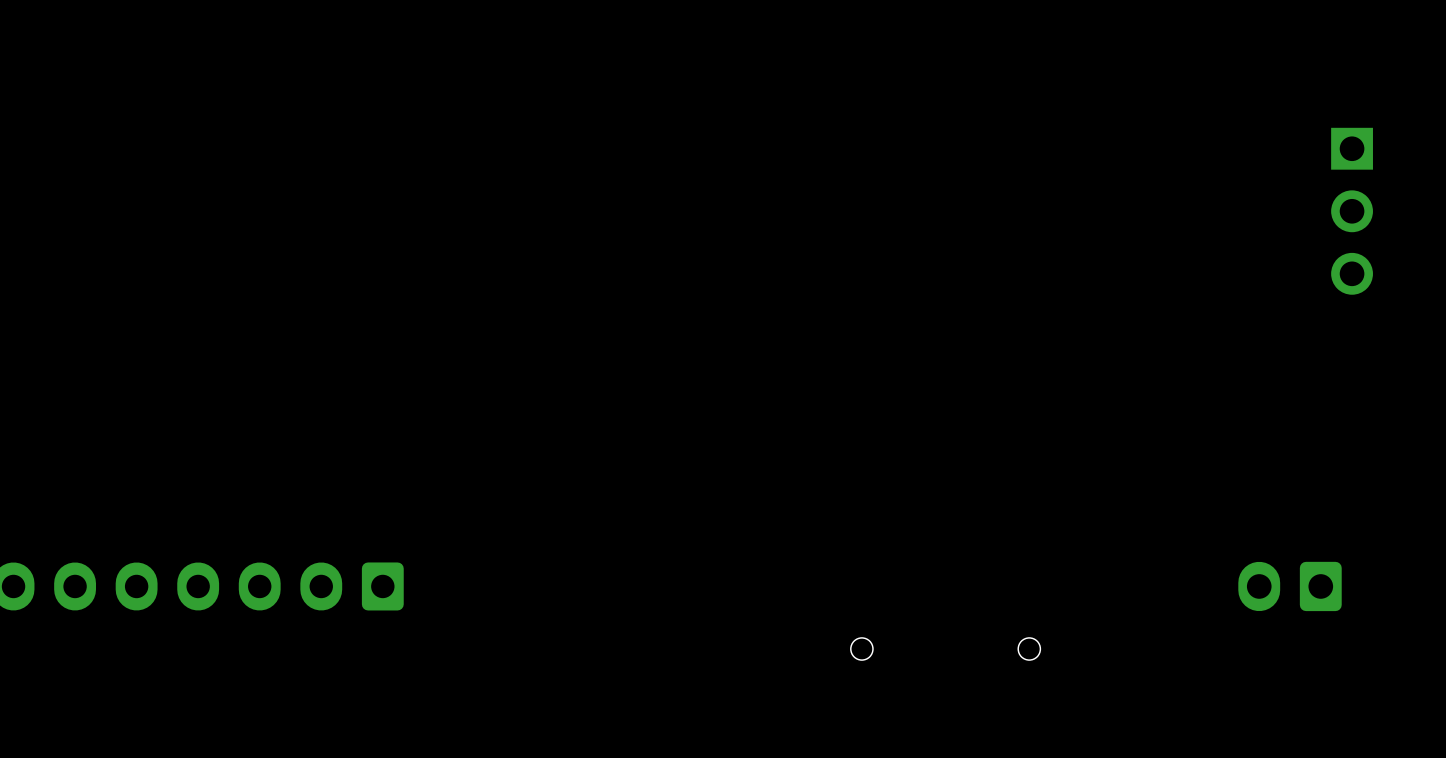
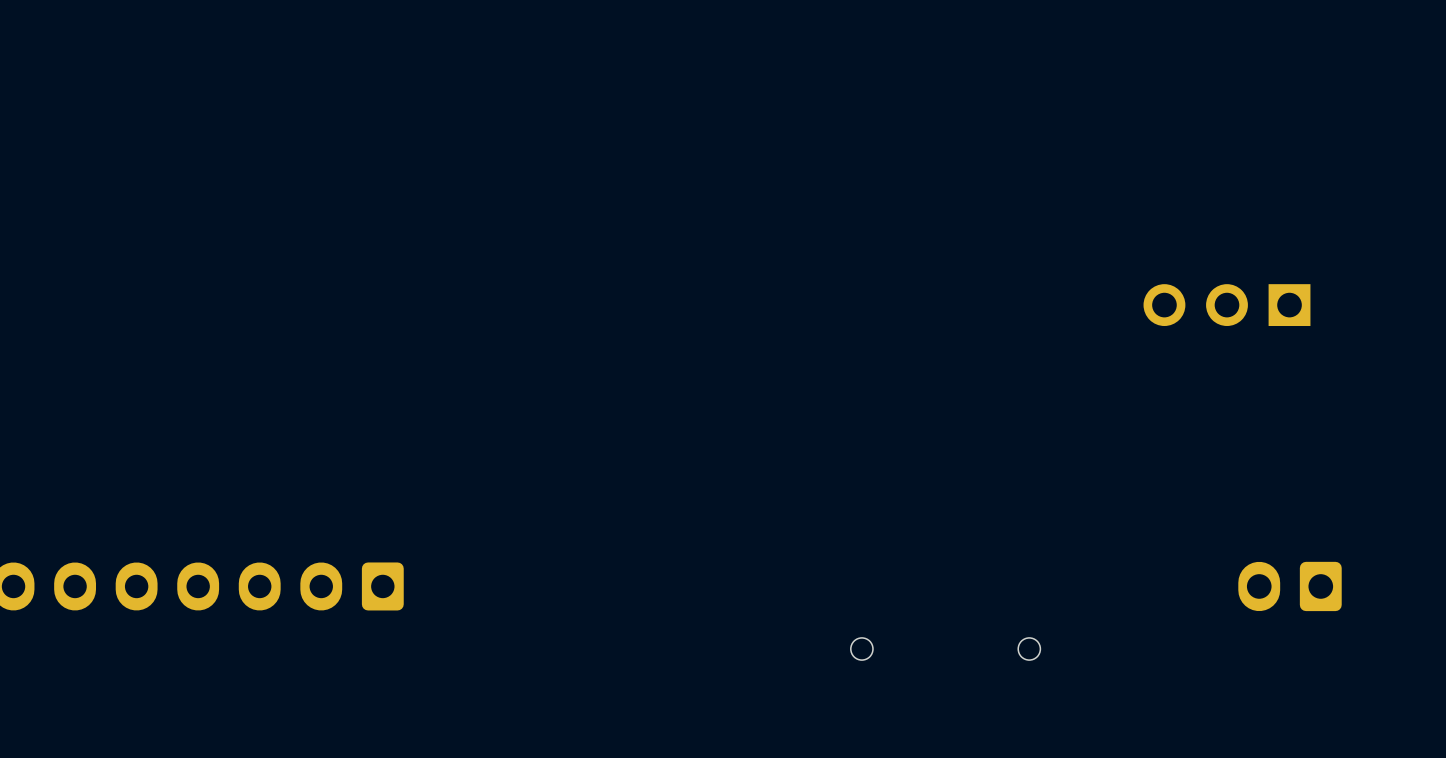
part rotation: 0° (1352, 211) -> 90° clockwise (1226, 305)
part position: (1352, 211) -> (1226, 305)

